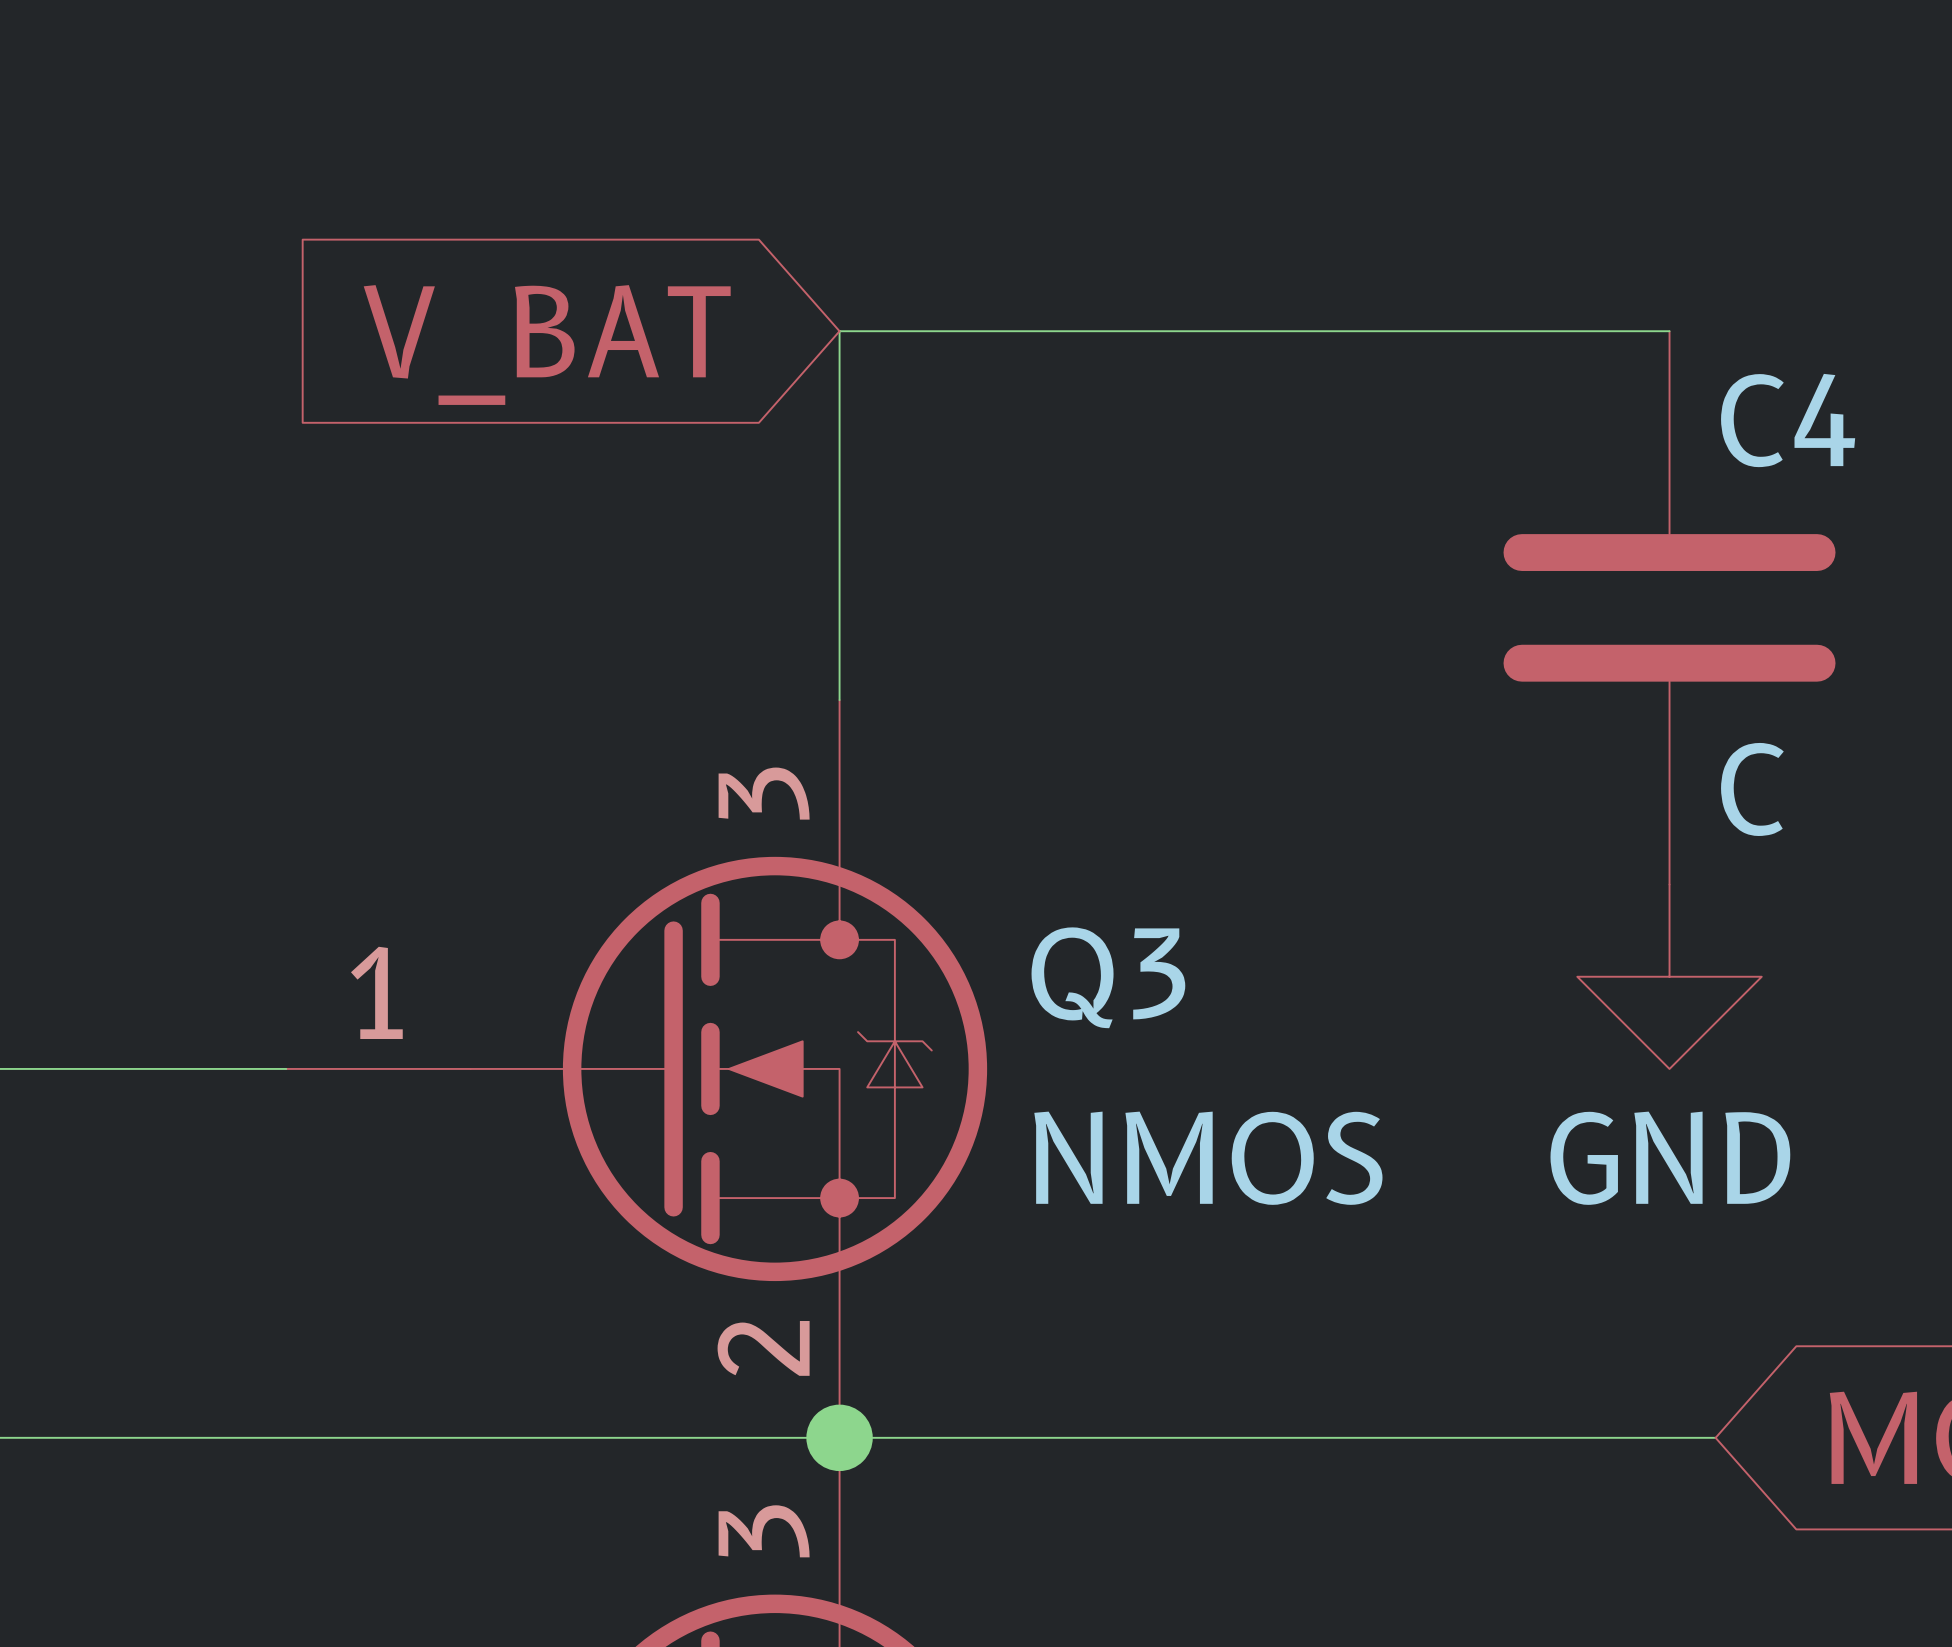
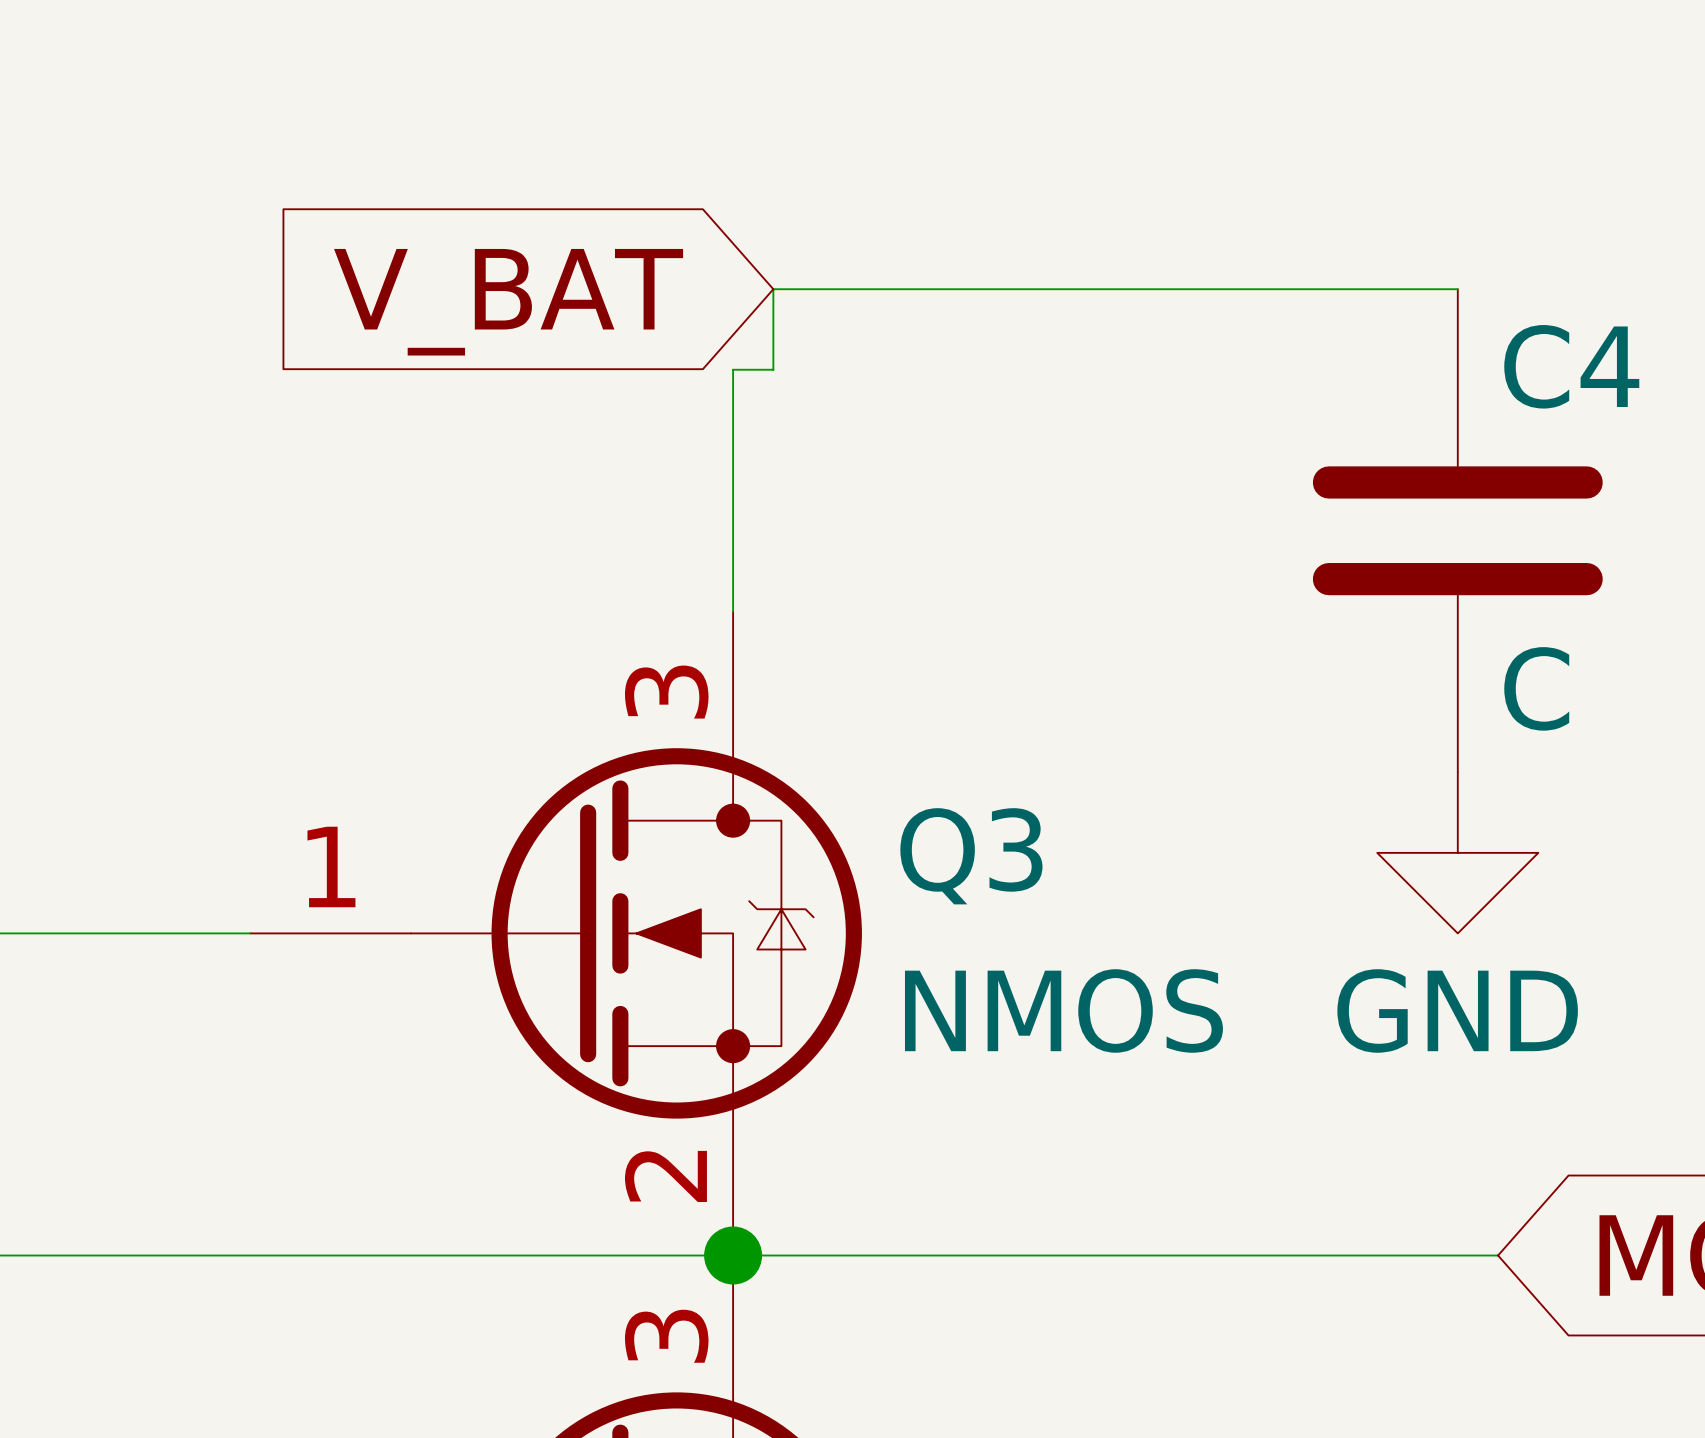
wire: (885, 331) (839, 331) (839, 423) -> (773, 289) (773, 369) (733, 369)
global label position: V_BAT (547, 345) -> V_BAT (508, 302)

